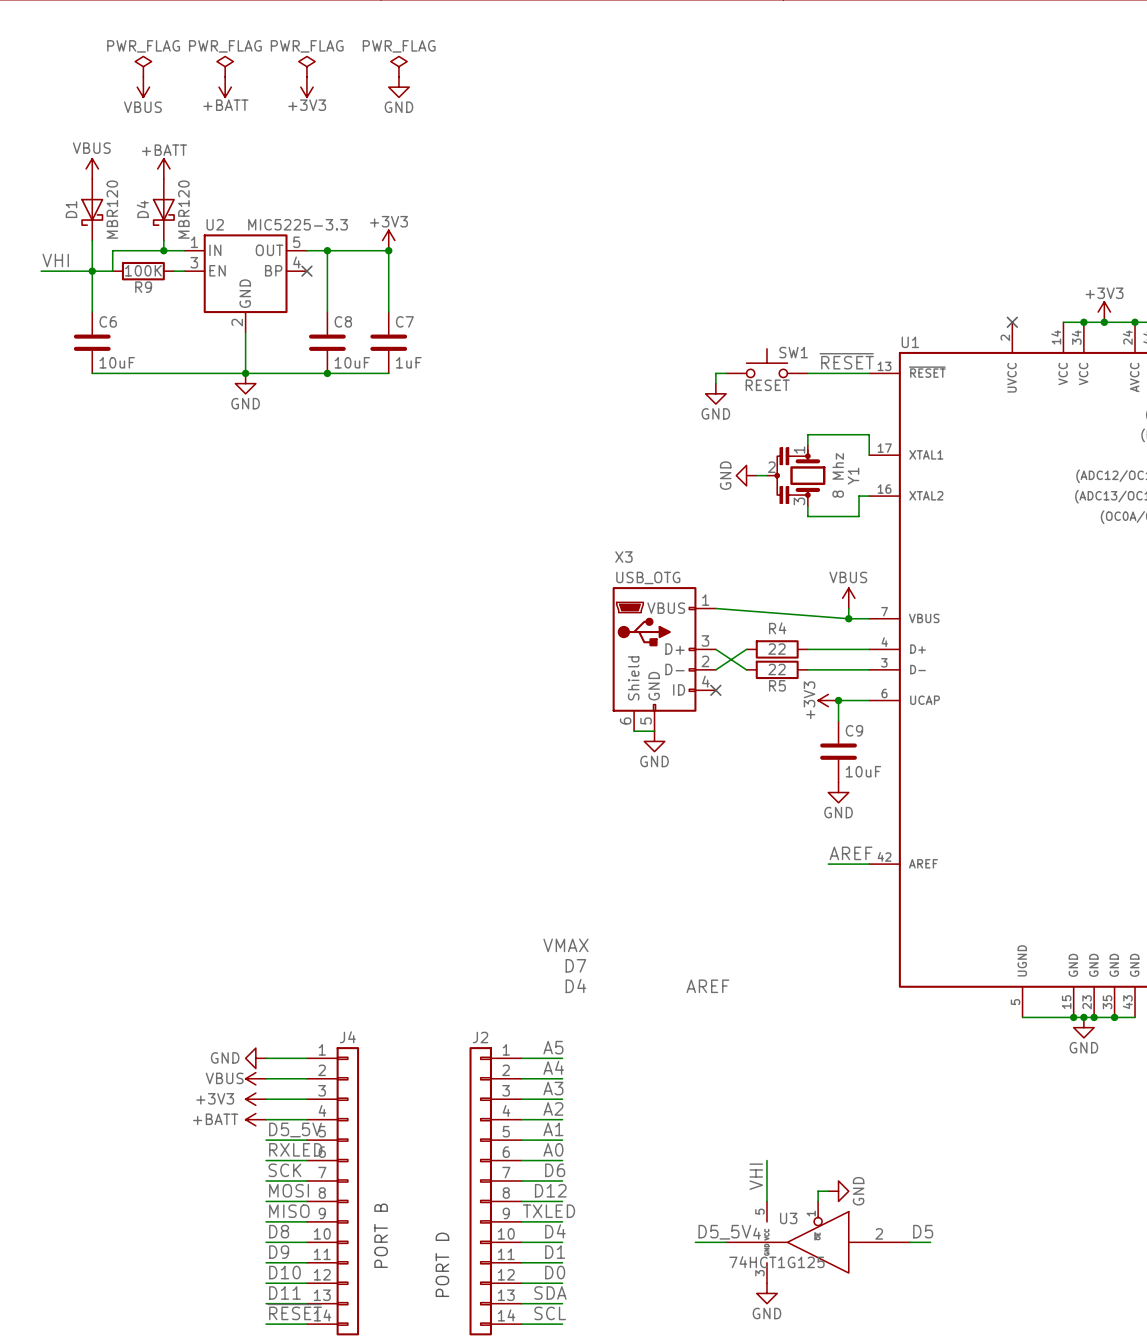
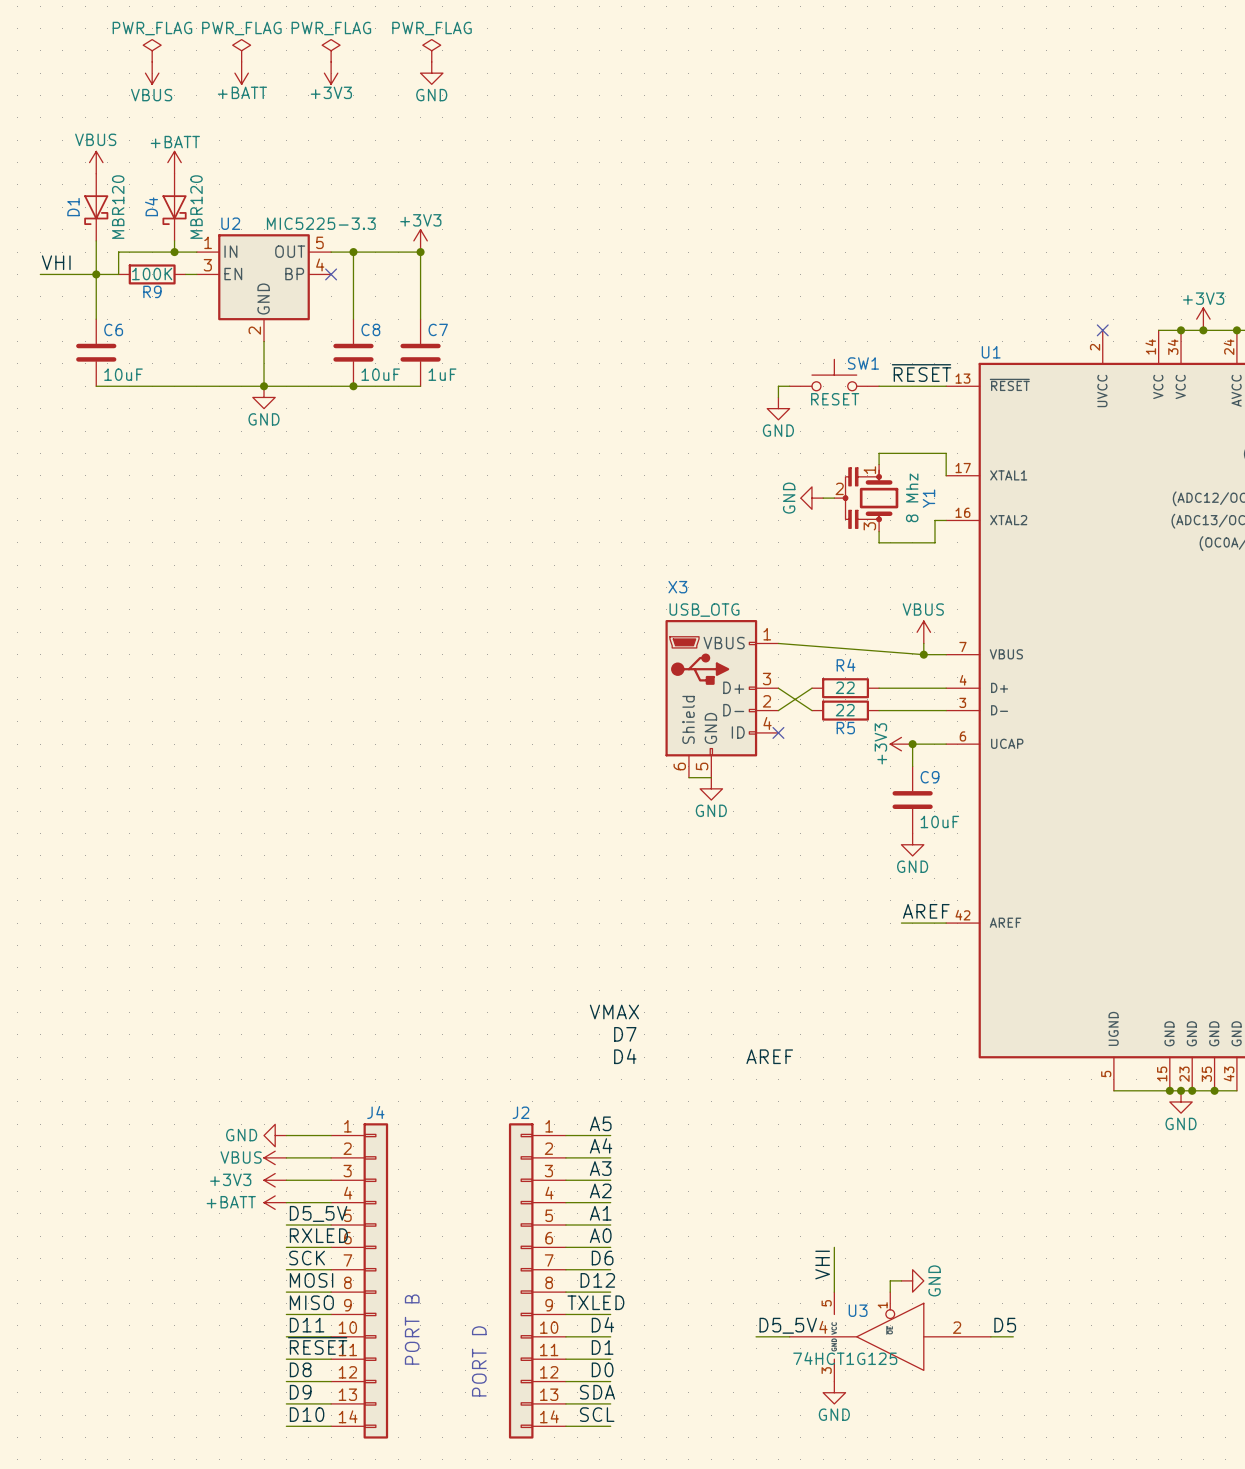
label: D8 (279, 1231) -> D11 (307, 1325)
label: D9 (279, 1252) -> ~{RESET} (317, 1345)
label: D10 (284, 1272) -> D8 (300, 1369)
label: D11 (284, 1292) -> D9 (300, 1392)
label: ~{RESET} (294, 1312) -> D10 (307, 1414)

